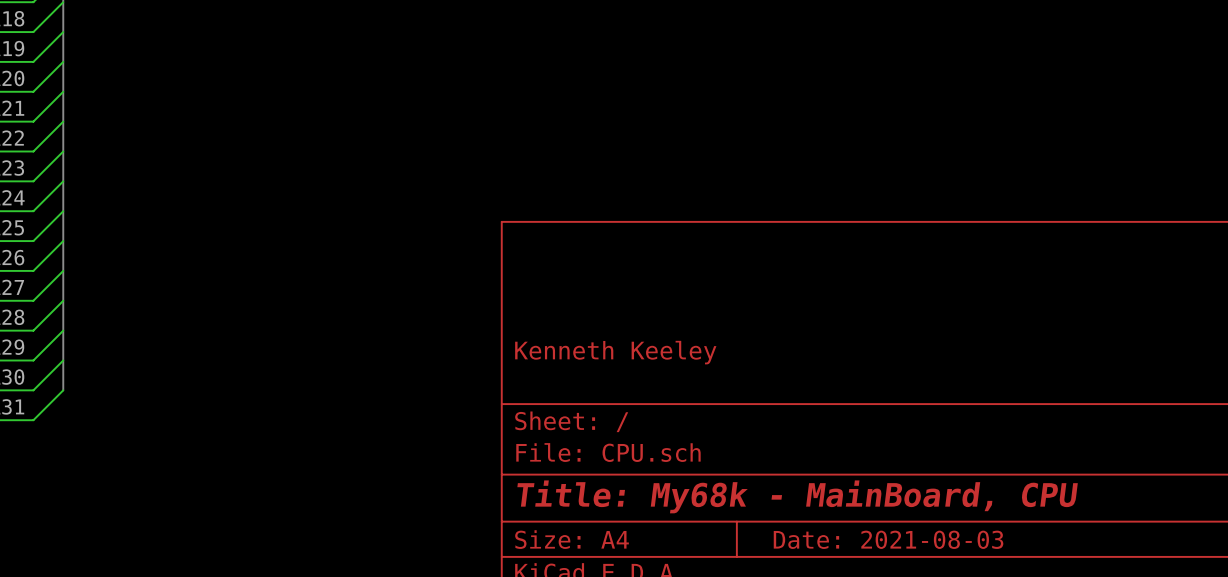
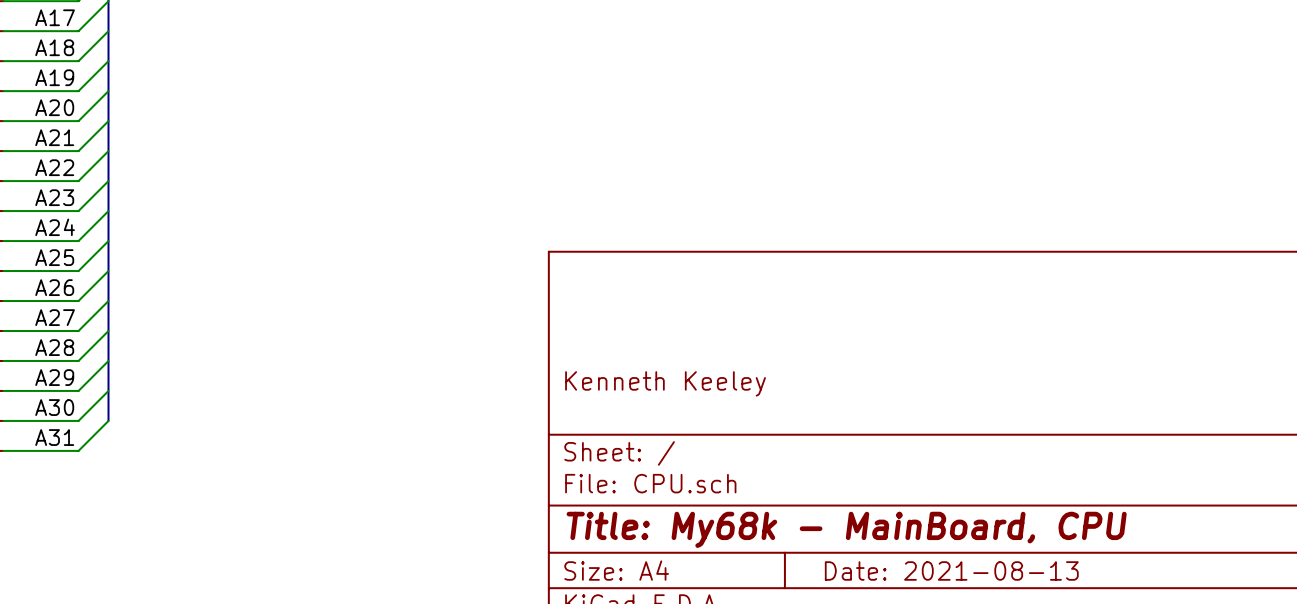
title block: Date: 2021-08-03 (888, 539) -> Date: 2021-08-13 (951, 570)

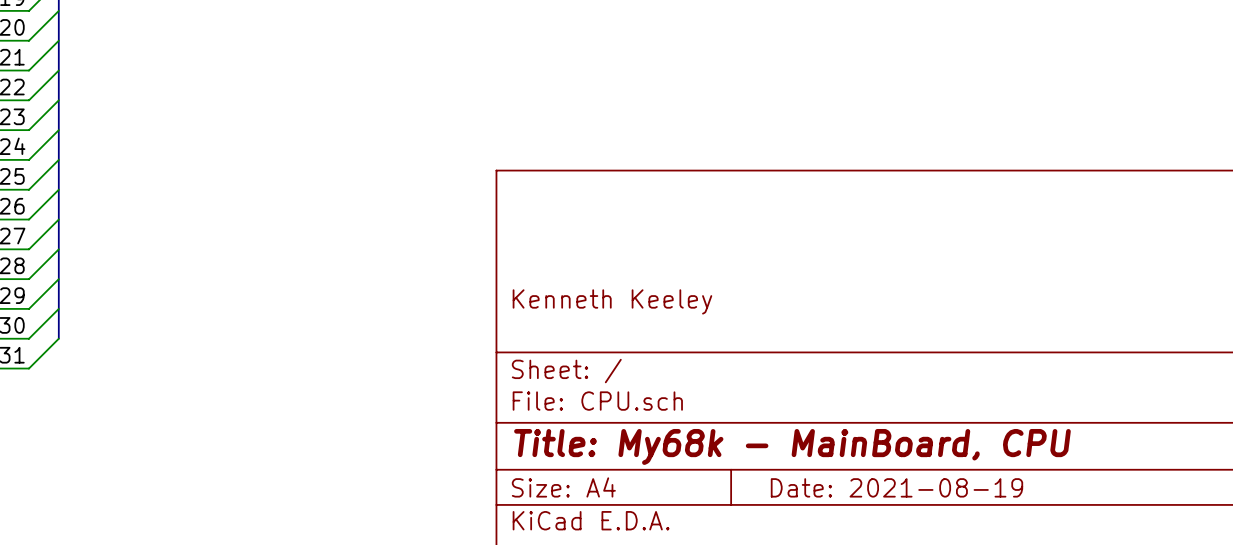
title block: Date: 2021-08-13 (951, 570) -> Date: 2021-08-19 (896, 487)

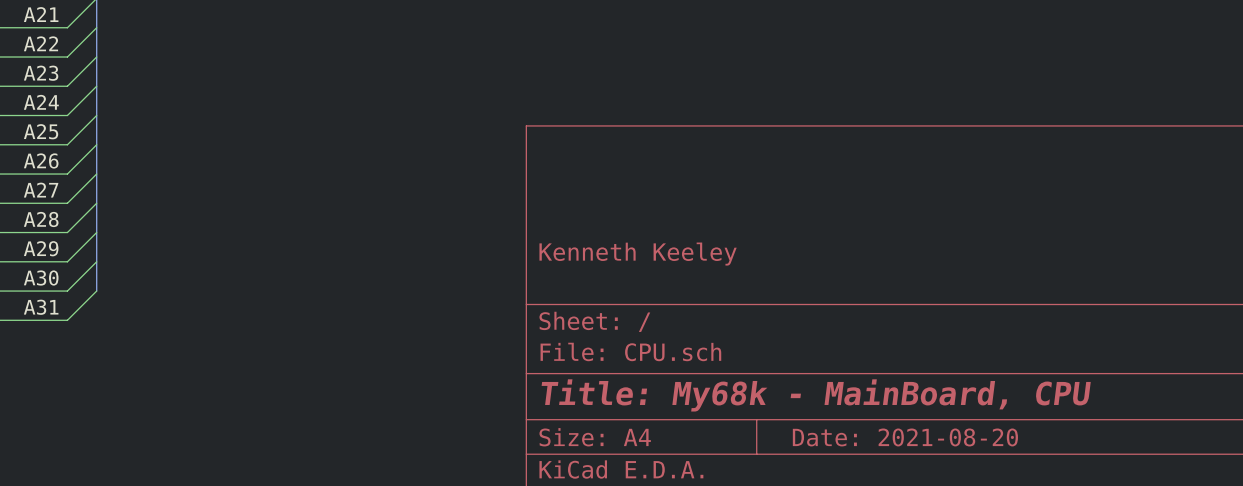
title block: Date: 2021-08-19 (896, 487) -> Date: 2021-08-20 (905, 437)

